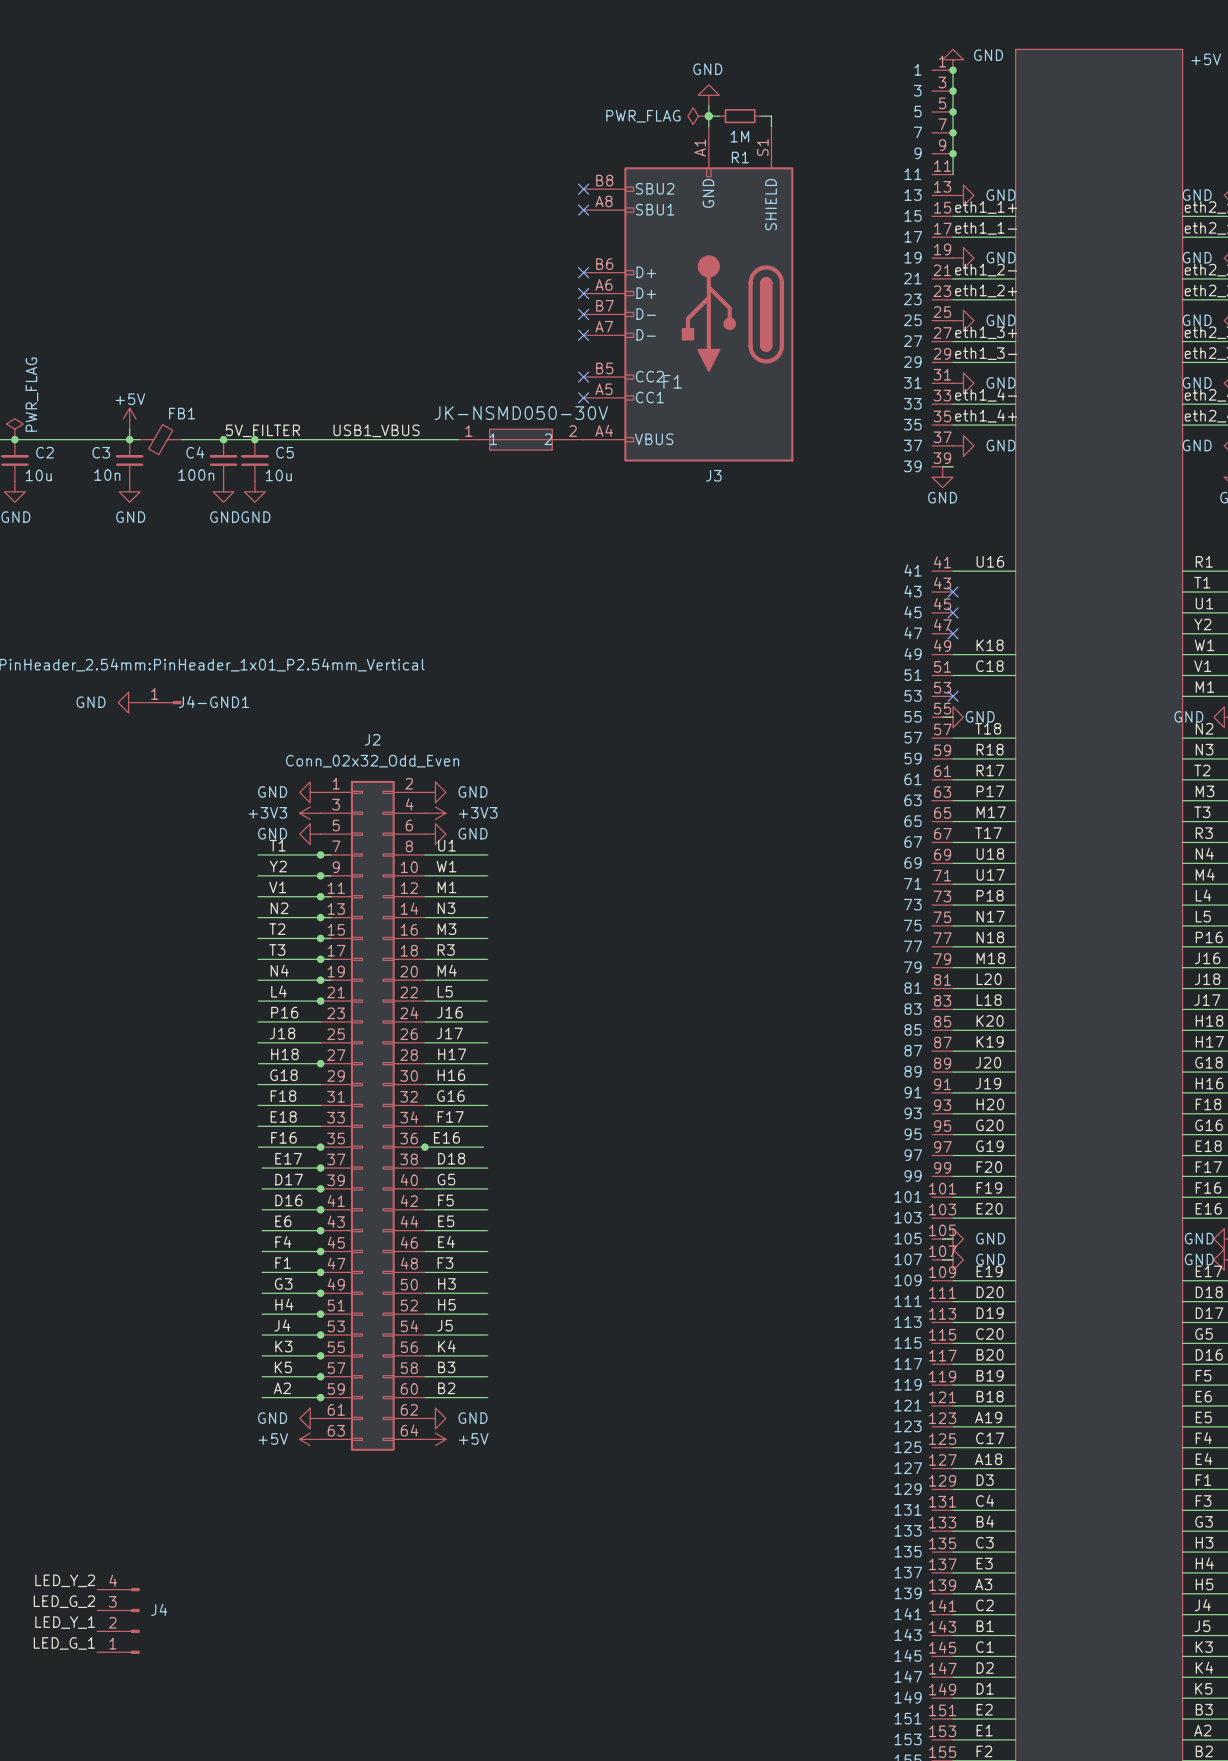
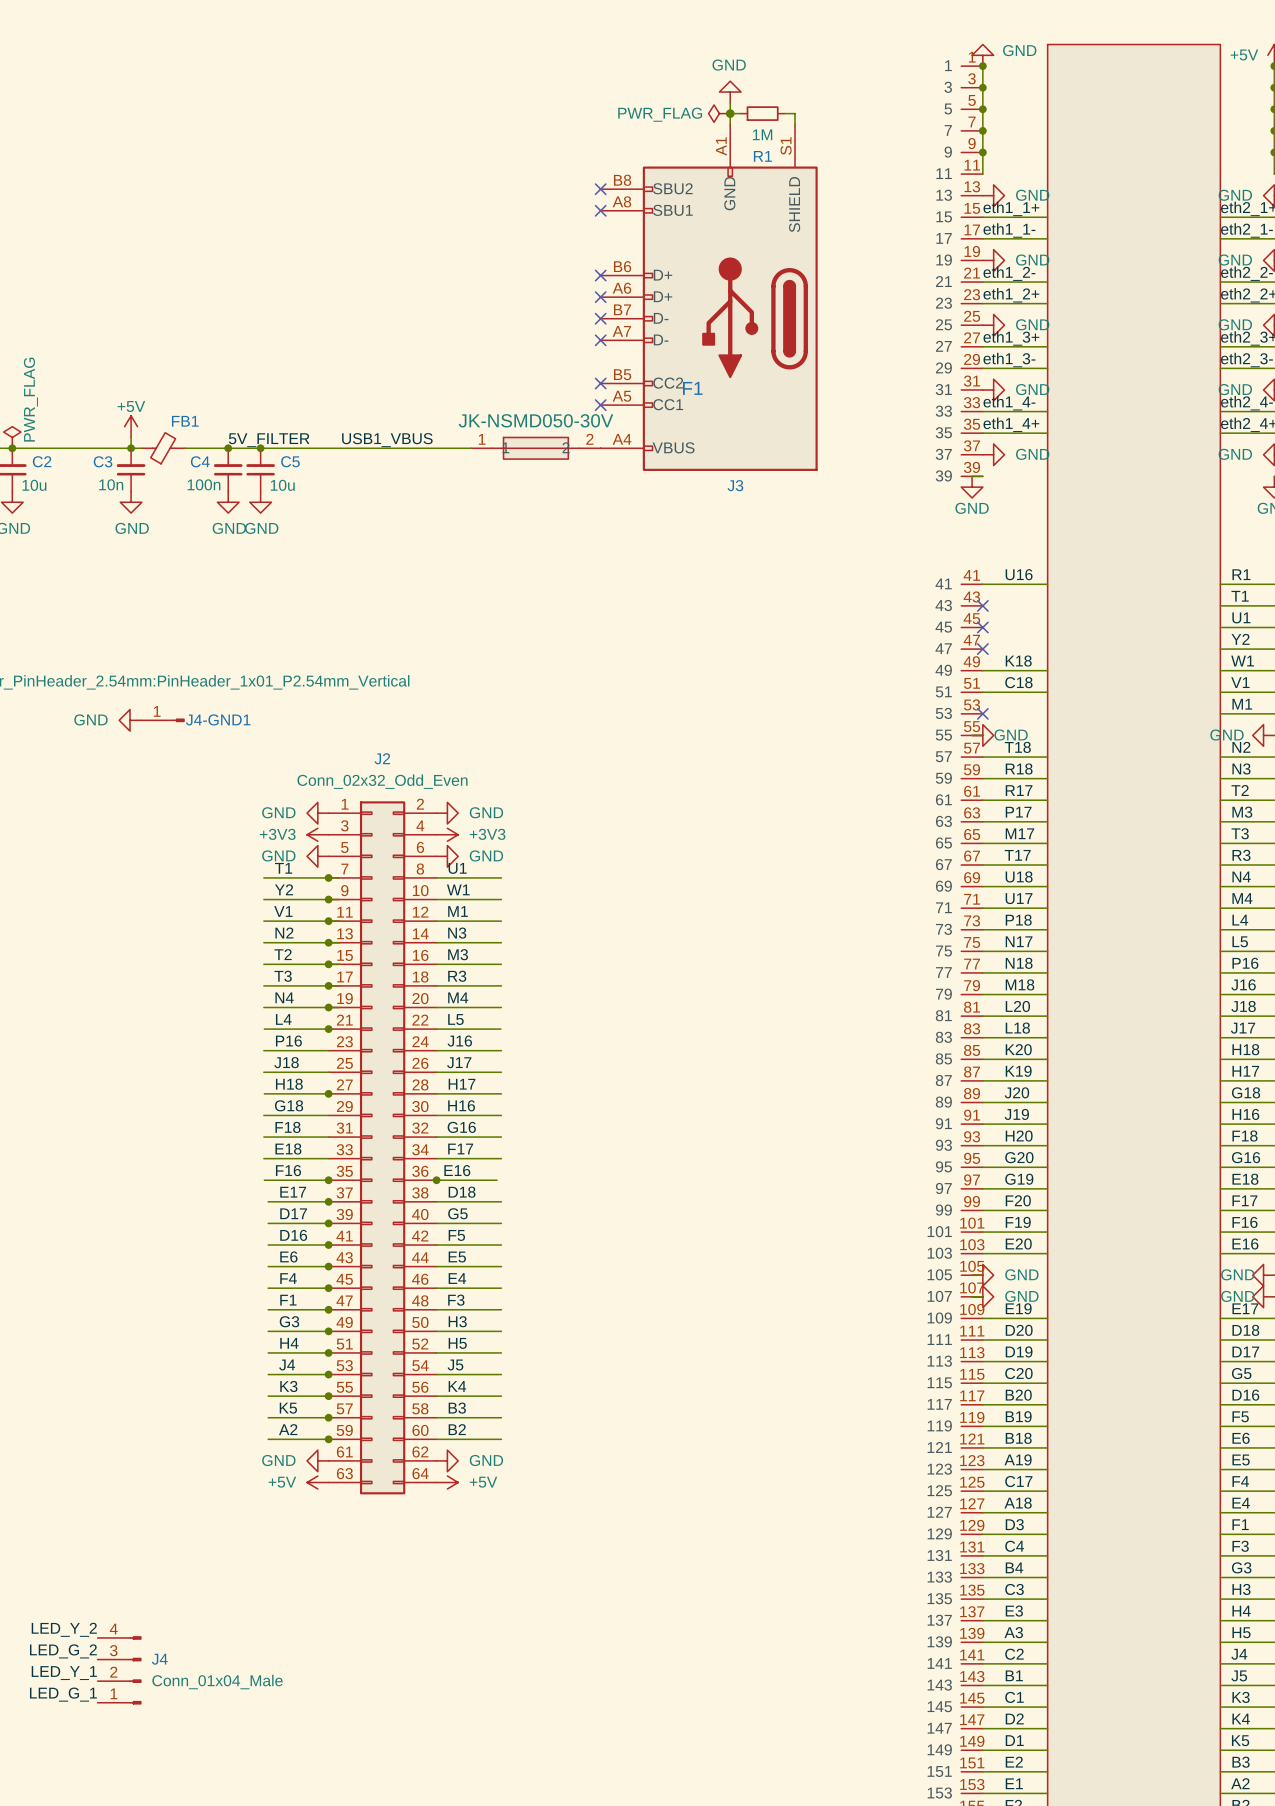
J4 value: none -> Conn_01x04_Male (217, 1682)

